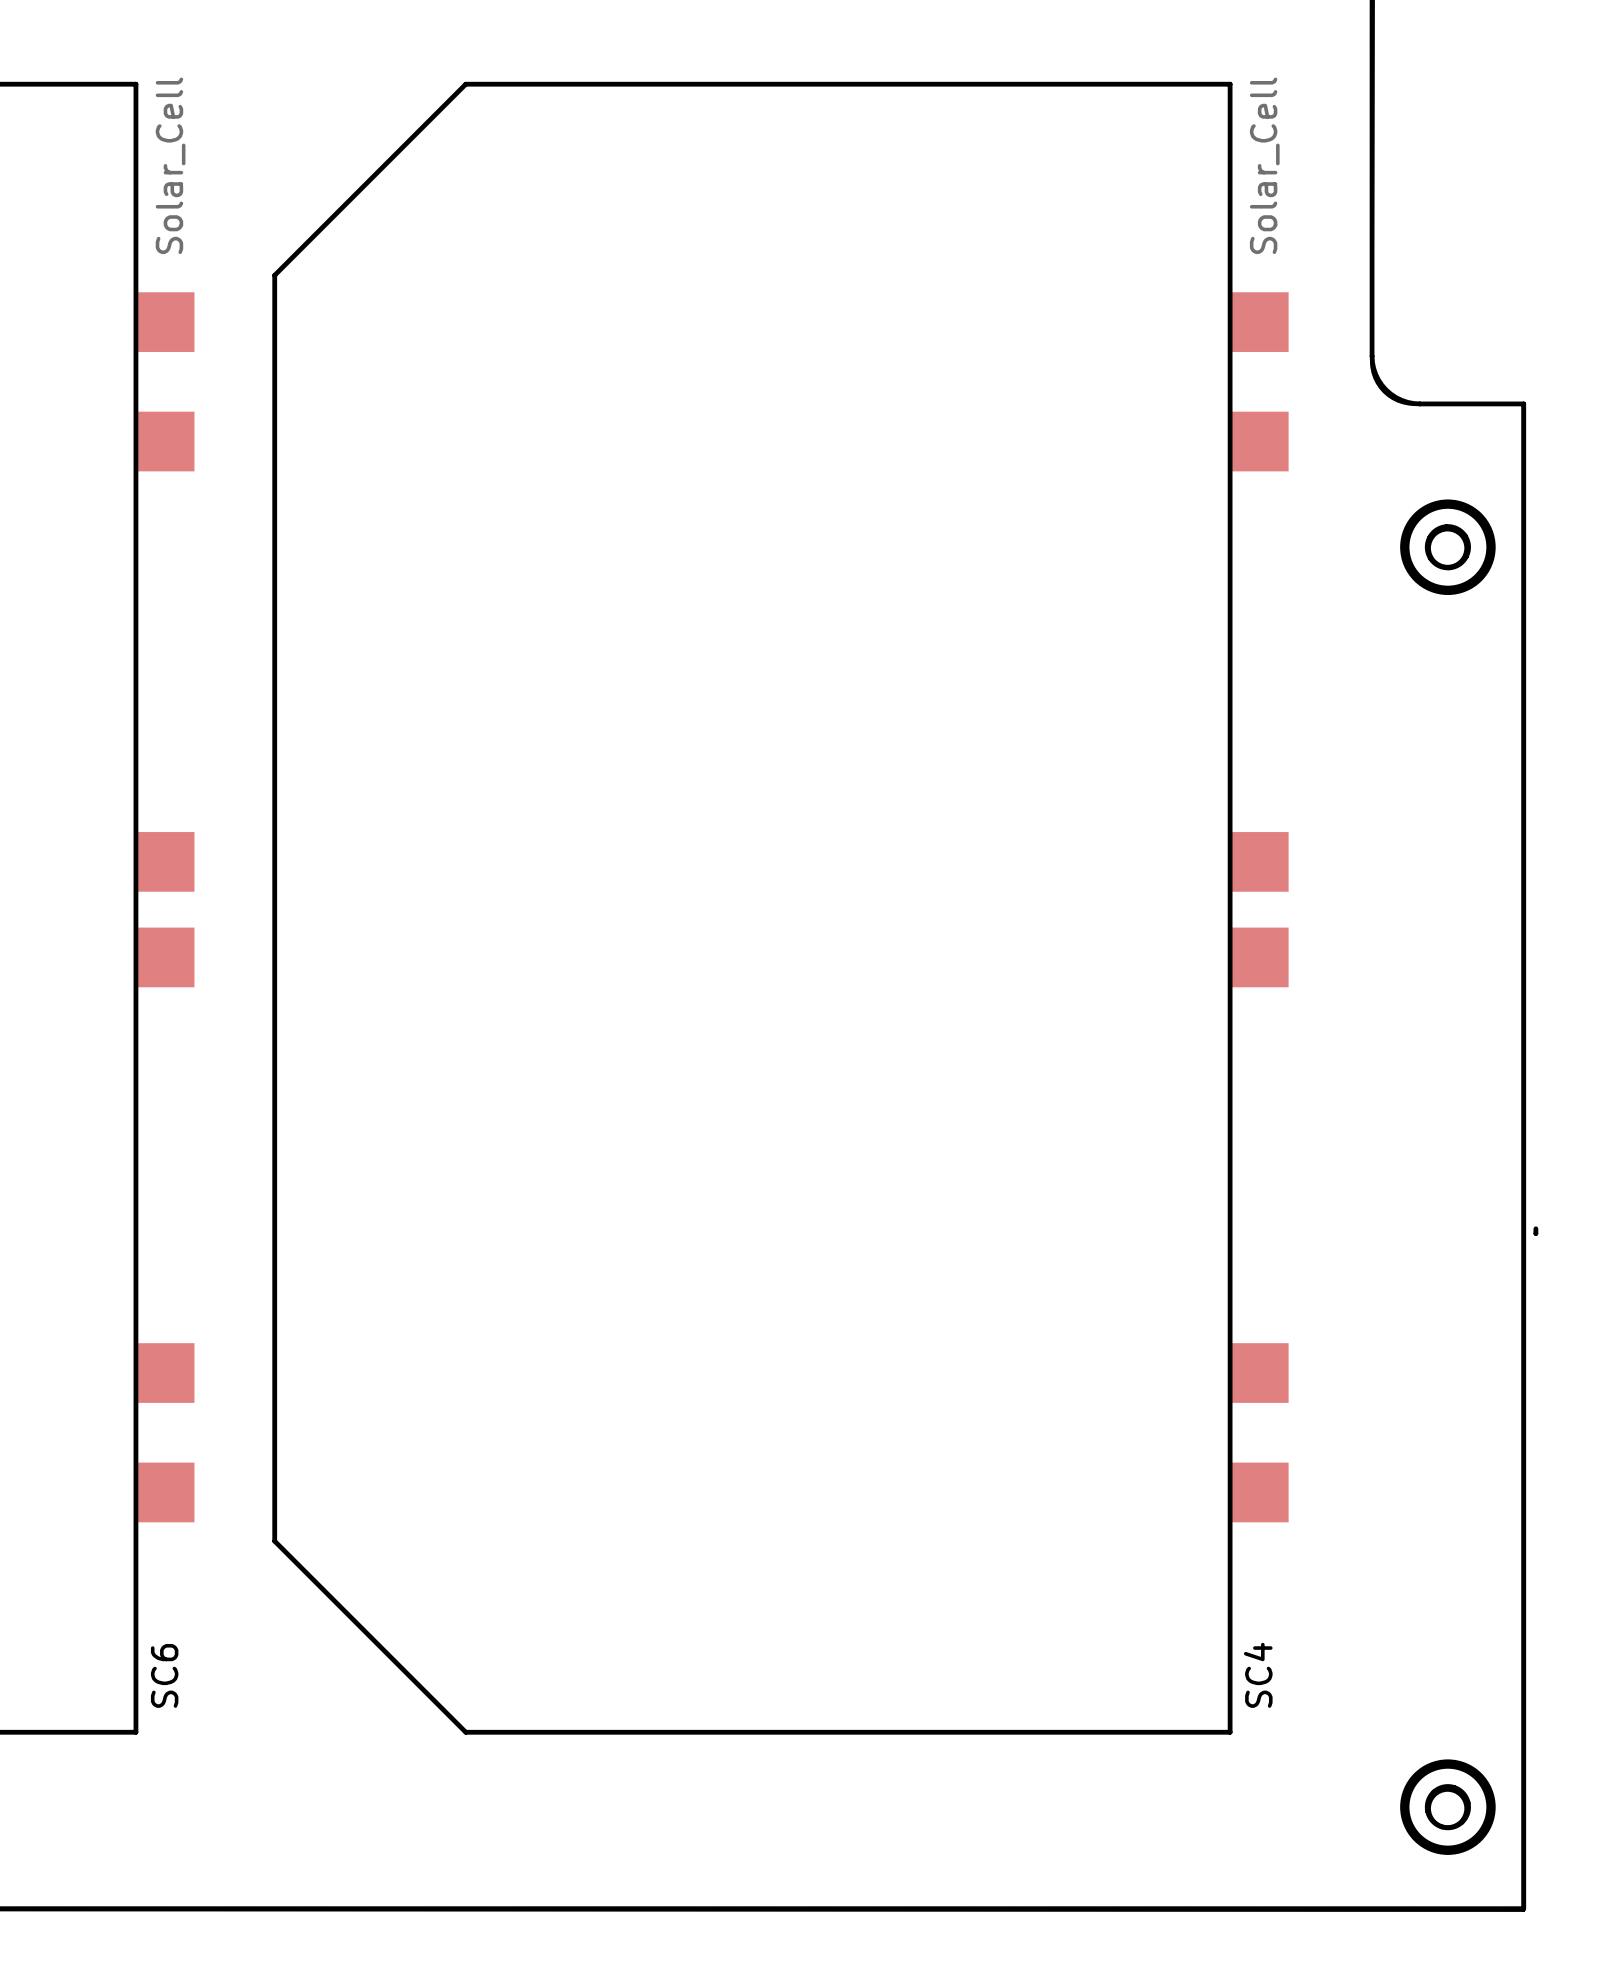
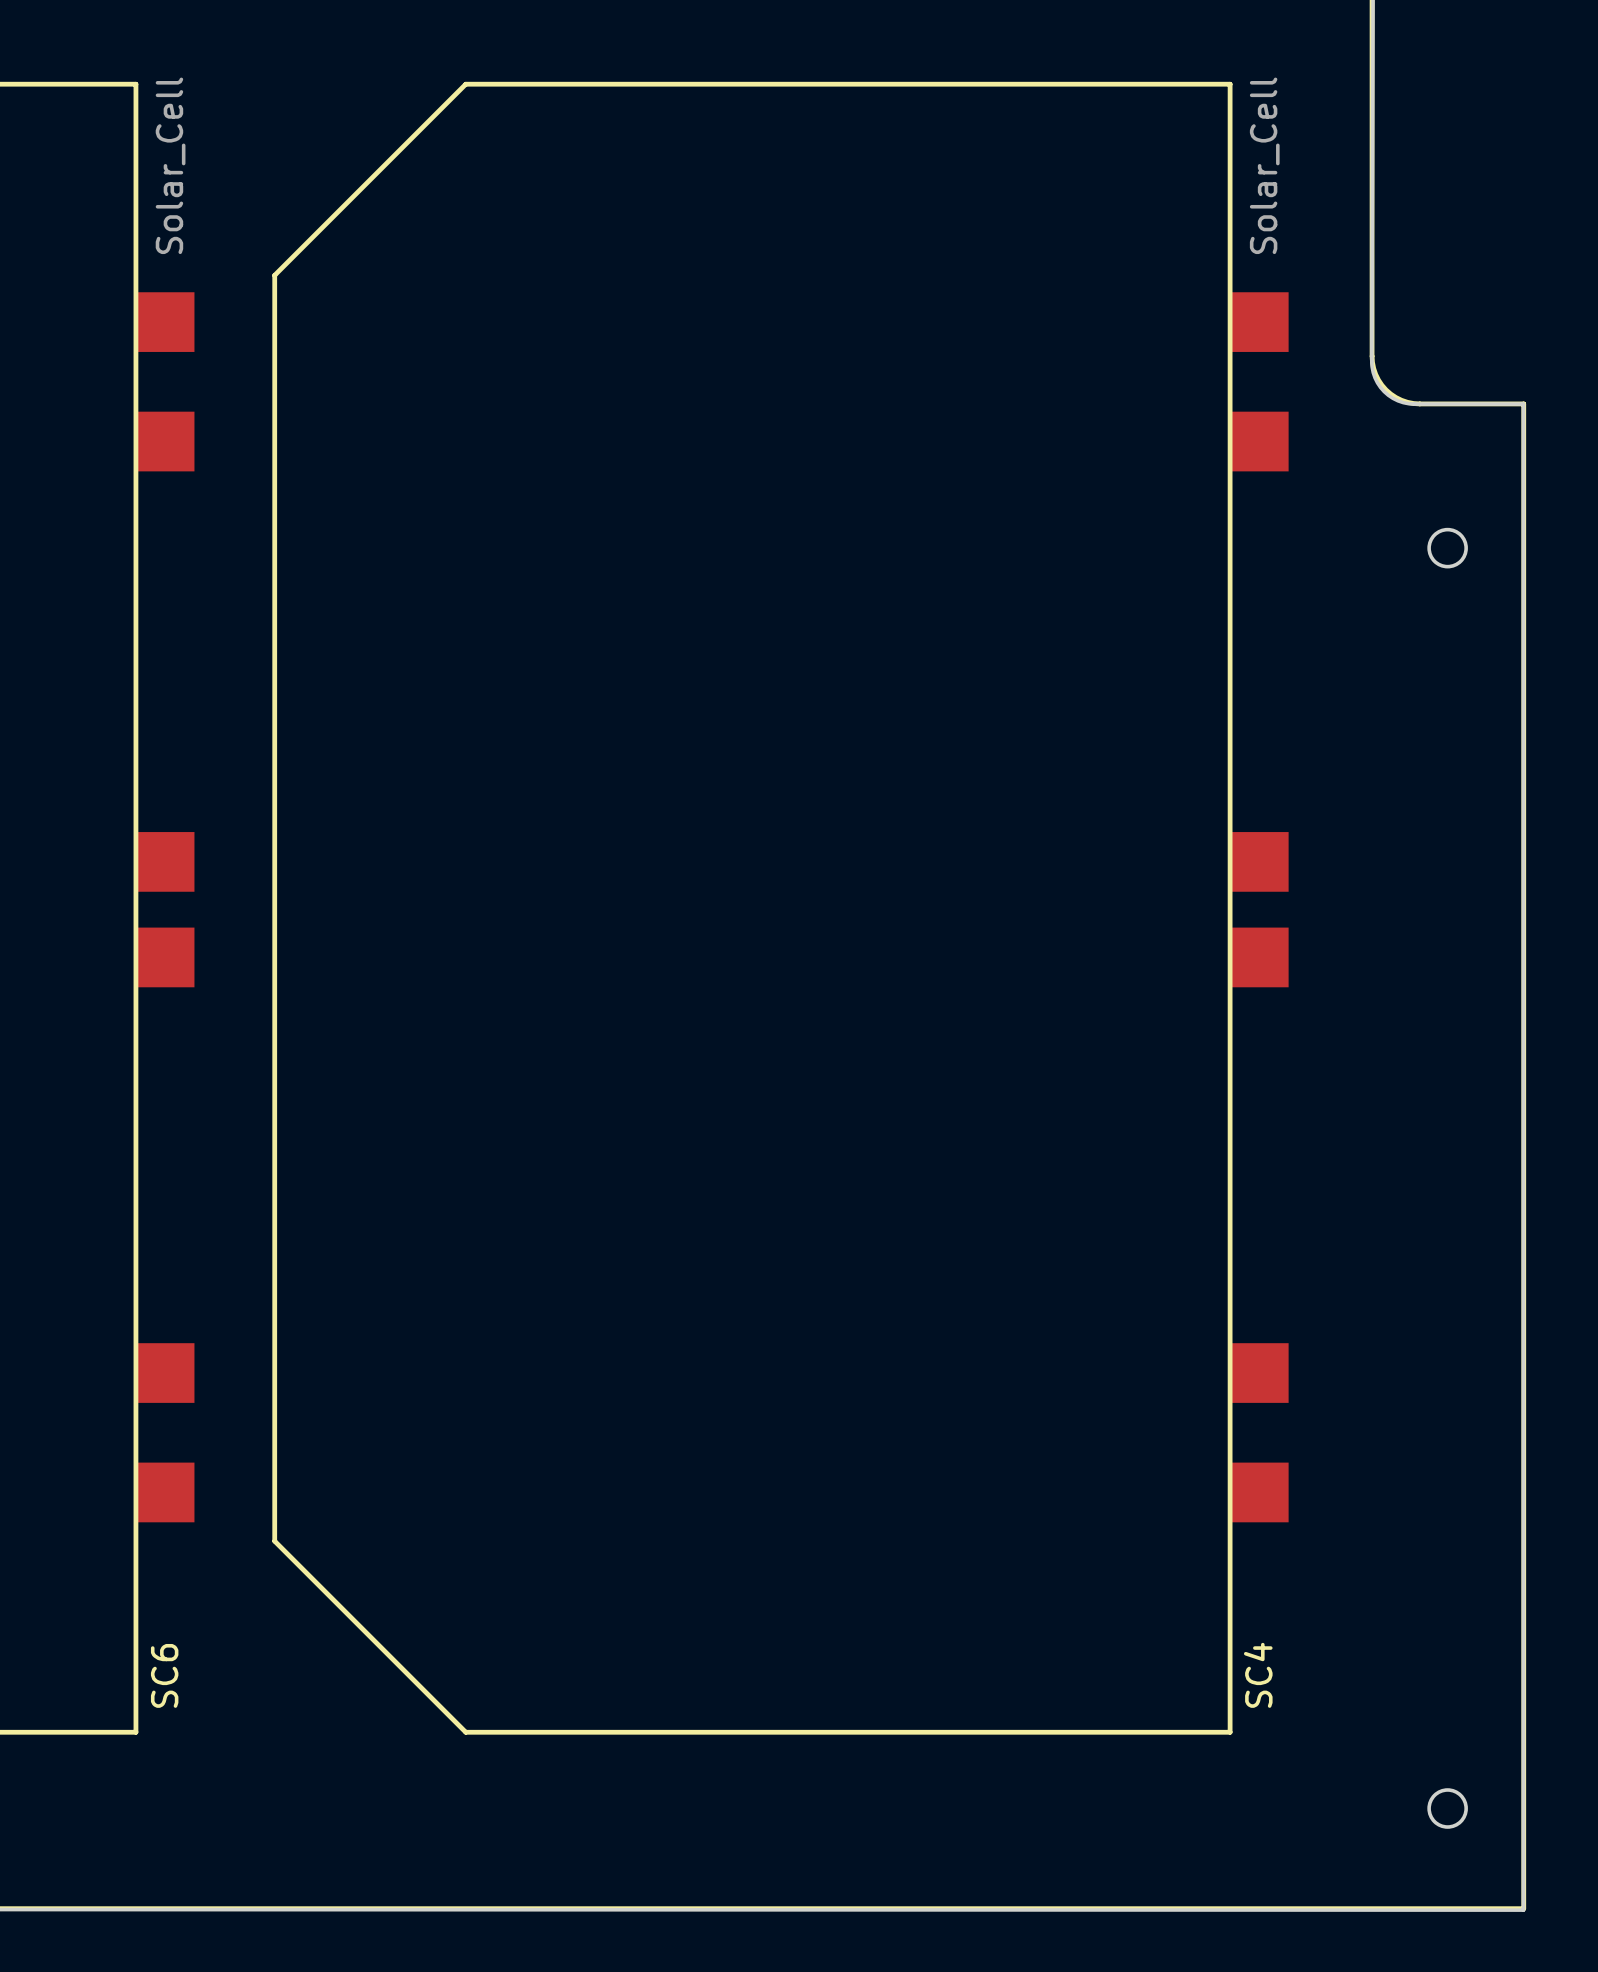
drawing: [1400, 499, 1496, 596] -> none
line: (1446, 526) (1438, 528) (1432, 533) (1428, 540) (1427, 548) (1429, 556) (1434, 562) (1441, 566) (1449, 567) (1456, 565) (1463, 560) (1467, 553) (1468, 545) (1466, 538) (1461, 531) (1454, 527) (1446, 526) -> none
line: (1535, 1228) (1535, 1233) -> none
drawing: [1400, 1759, 1496, 1855] -> none
line: (1454, 1787) (1461, 1791) (1466, 1797) (1468, 1805) (1467, 1813) (1463, 1820) (1457, 1825) (1449, 1827) (1441, 1826) (1434, 1823) (1429, 1816) (1427, 1809) (1428, 1801) (1431, 1793) (1438, 1788) (1445, 1786) (1454, 1787) -> none

